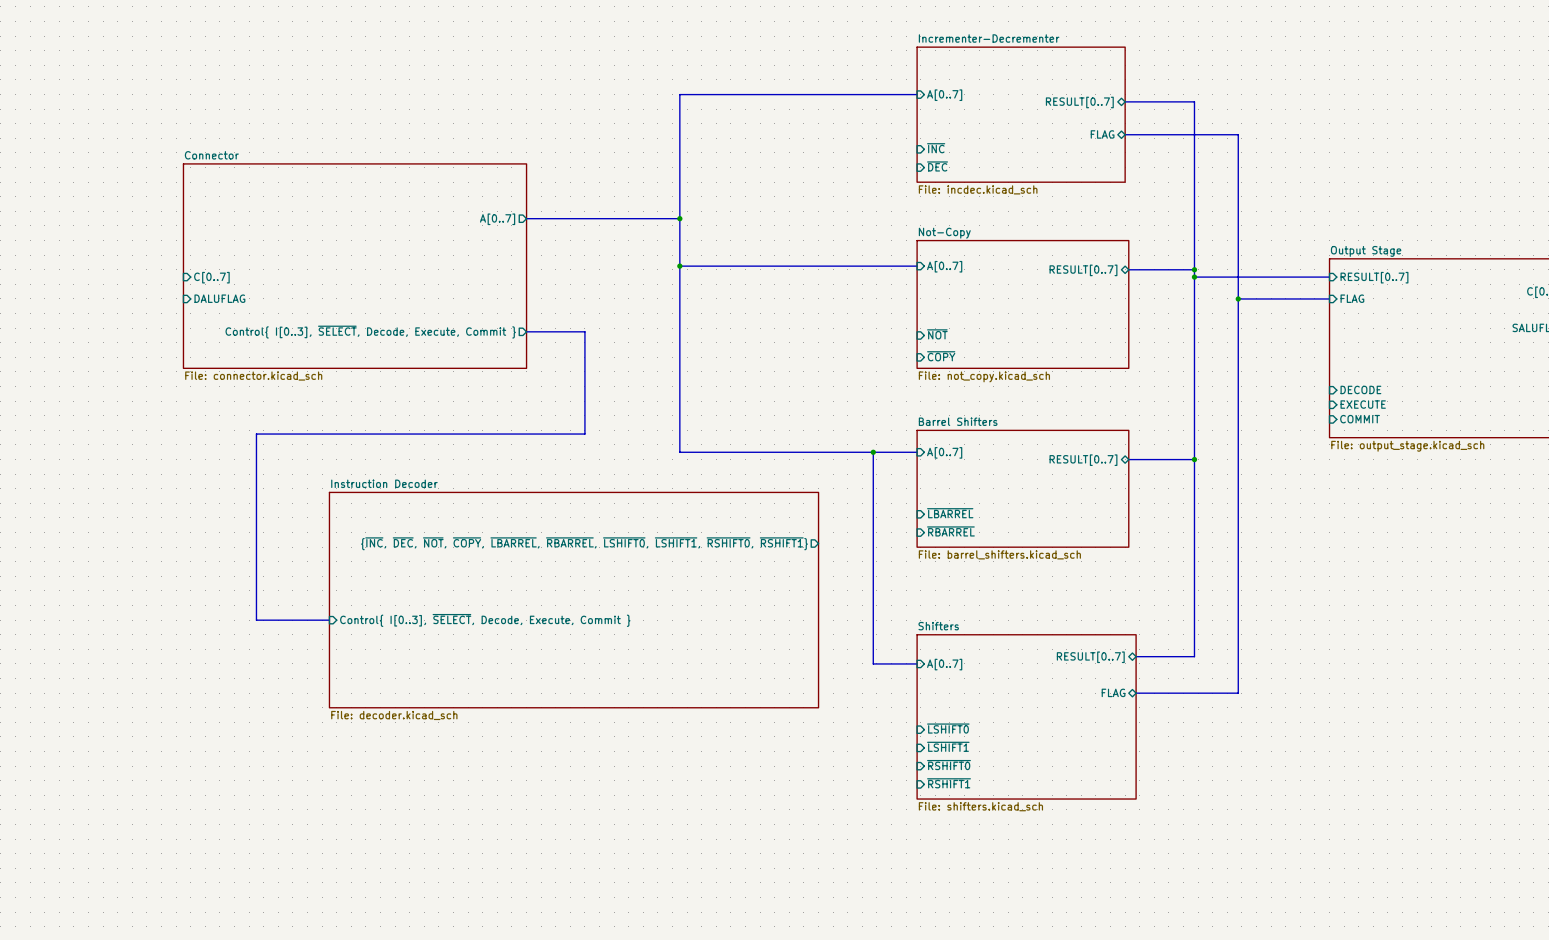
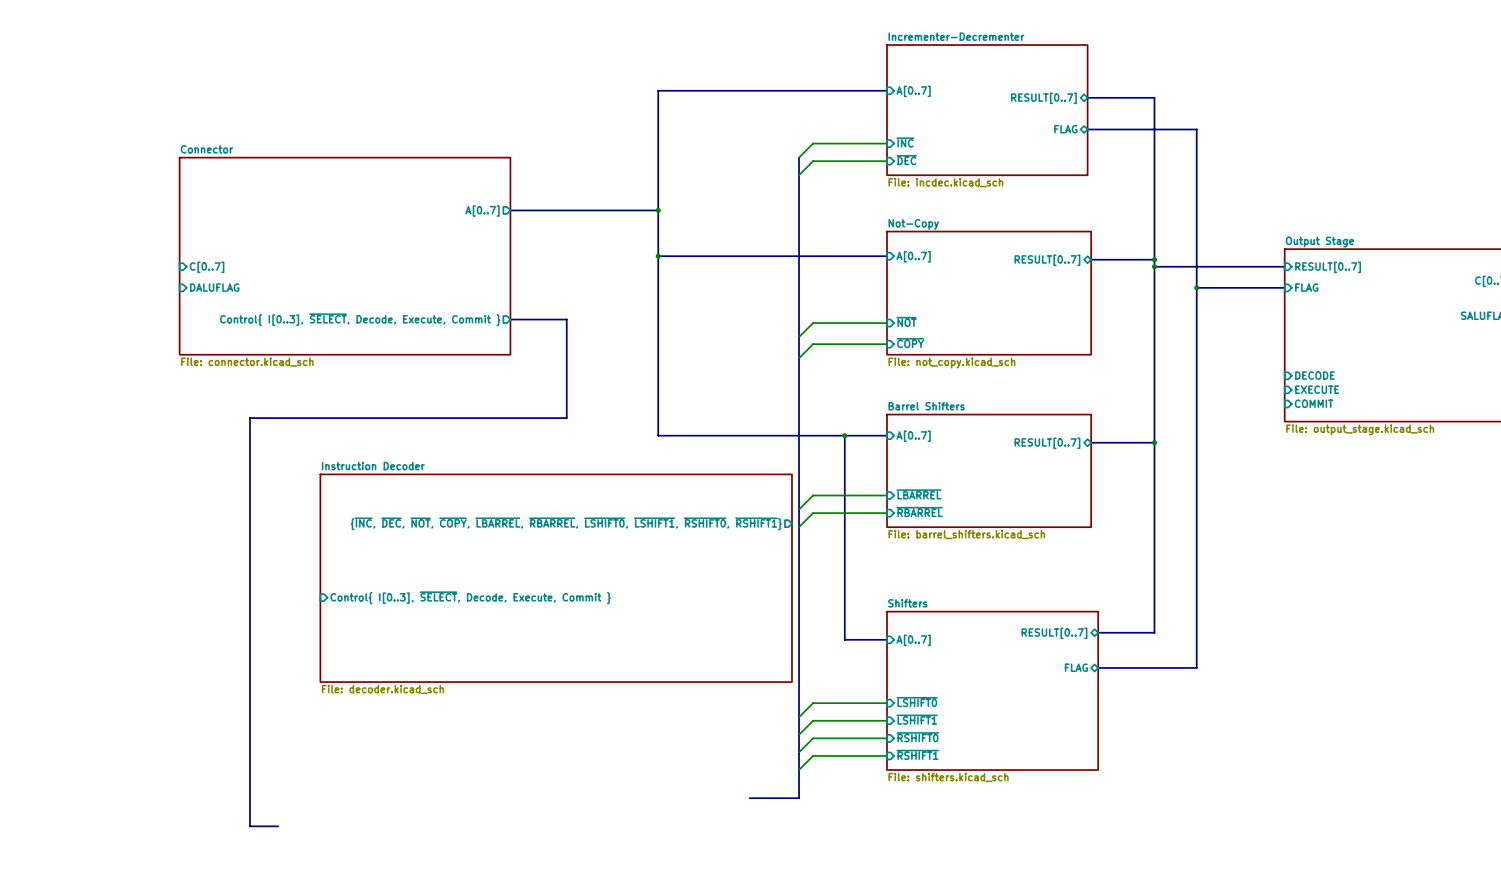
wire: none -> (887, 143) (813, 143) (799, 157)
bus: none -> (799, 157) (799, 798) (749, 798)
wire: none -> (887, 161) (813, 161) (799, 175)
wire: none -> (887, 323) (813, 323) (799, 337)
wire: none -> (887, 344) (813, 344) (799, 358)
wire: none -> (813, 495) (799, 509)
wire: none -> (813, 495) (887, 495)
wire: none -> (887, 513) (813, 513) (799, 527)
bus: (256, 620) (329, 620) -> (250, 597) (250, 826) (278, 826)
wire: none -> (887, 703) (813, 703) (799, 717)
wire: none -> (813, 720) (887, 720)
wire: none -> (813, 720) (799, 734)
wire: none -> (887, 738) (813, 738) (799, 752)
wire: none -> (887, 755) (813, 755) (799, 770)

